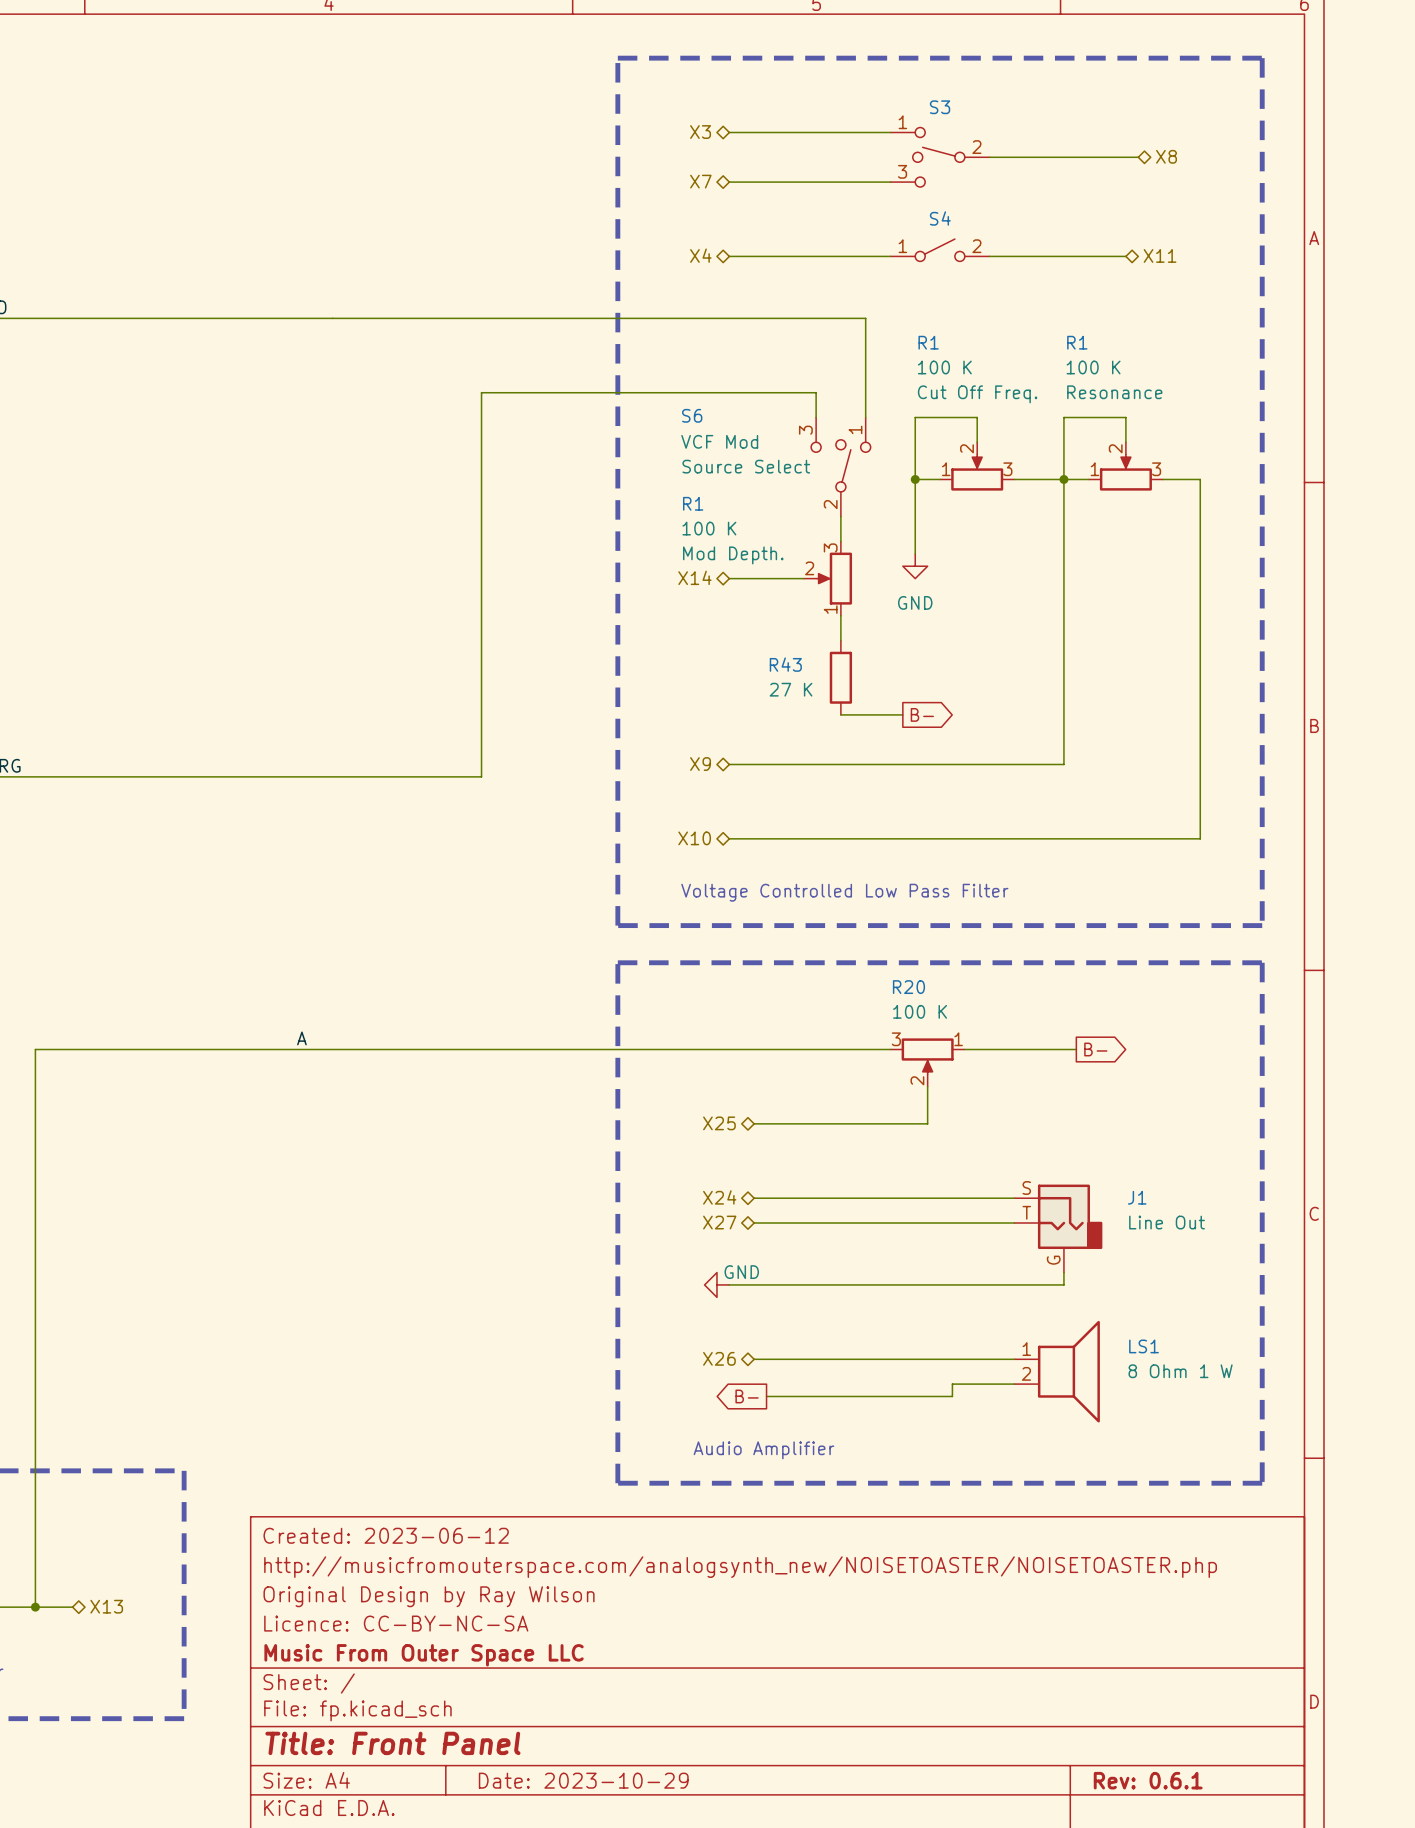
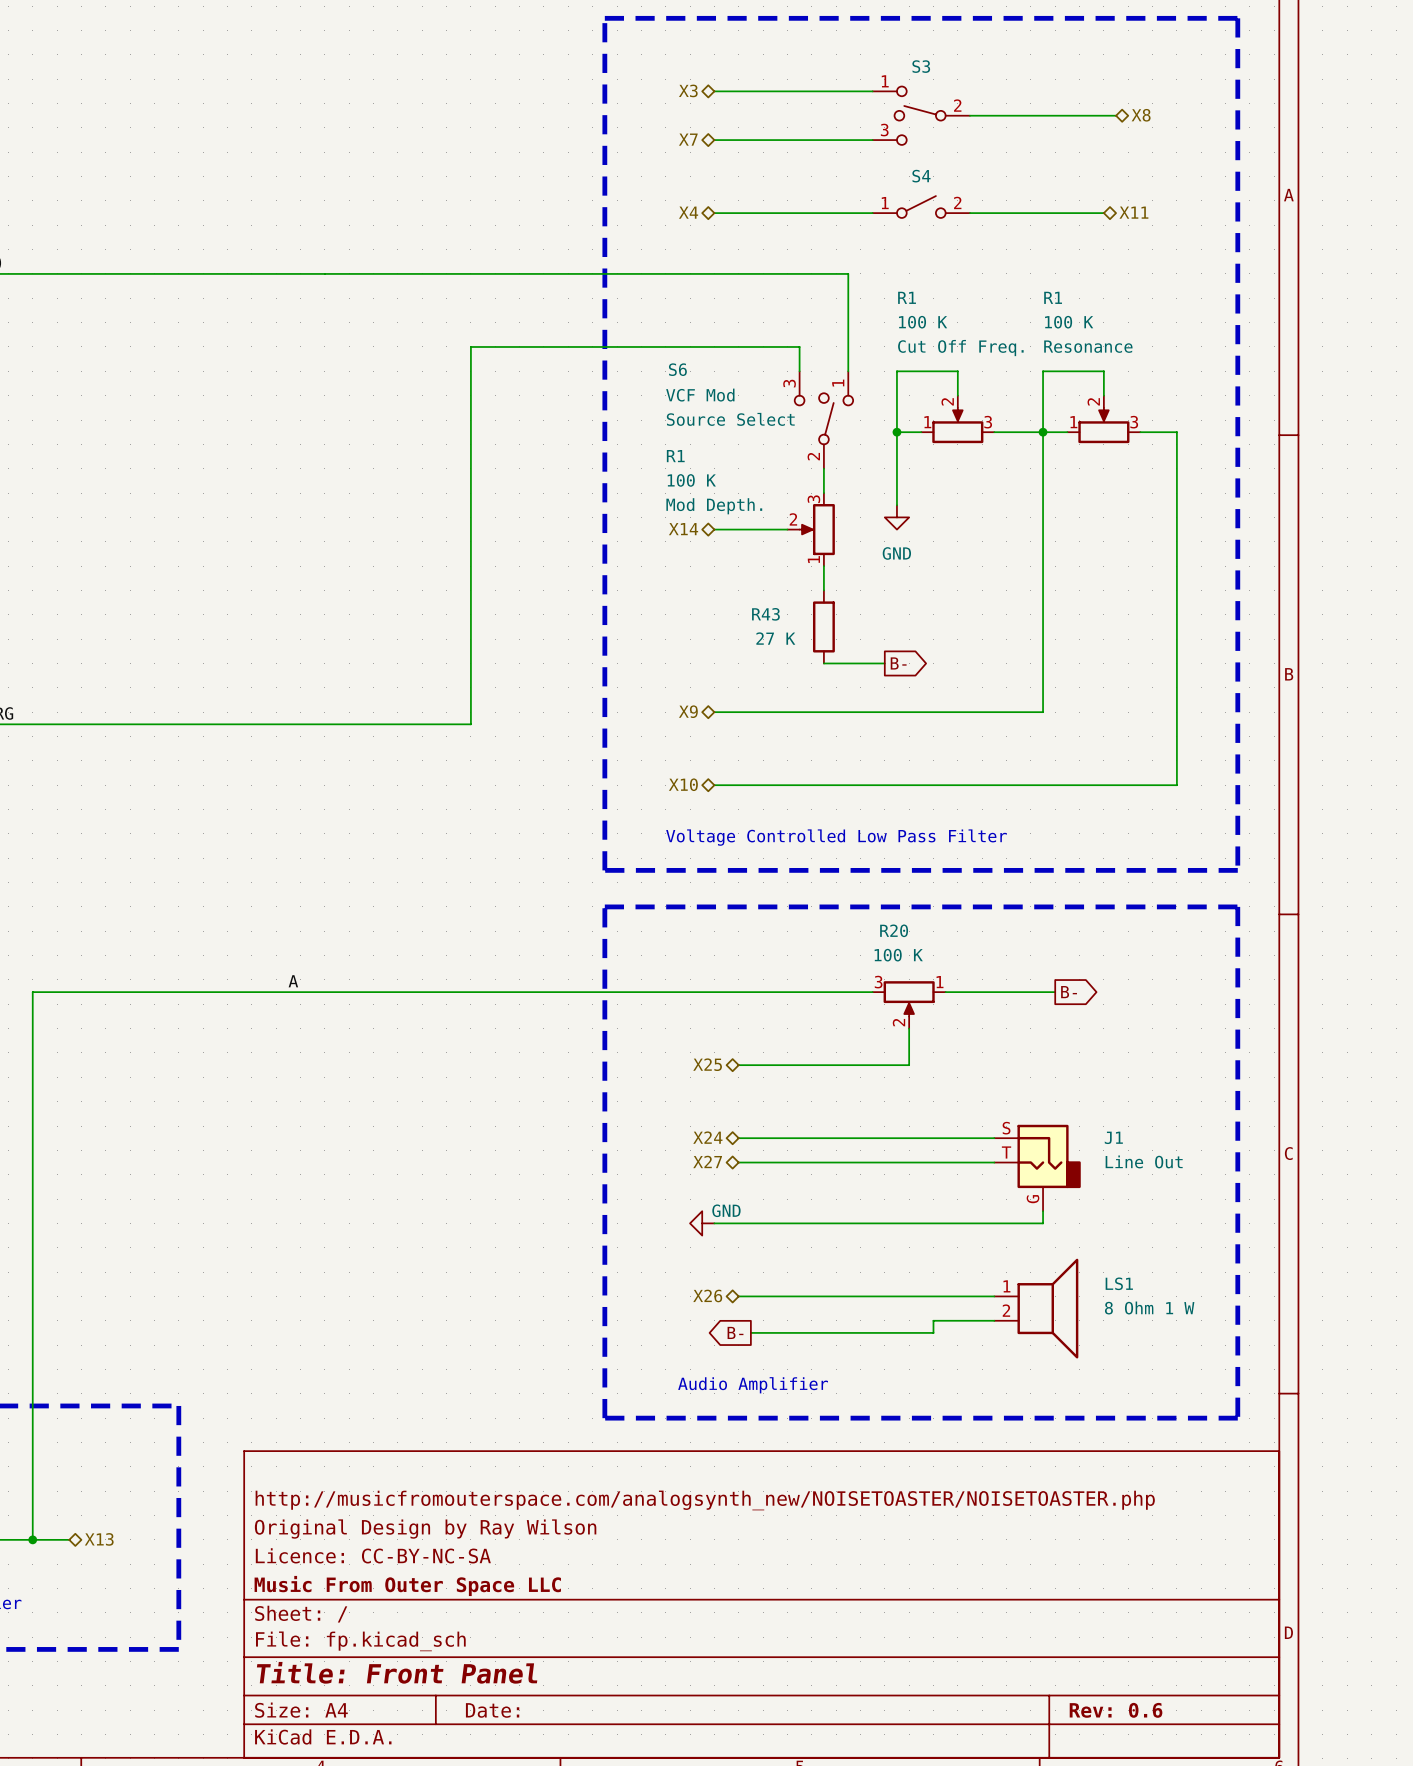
title block: Created: 2023-06-12 (386, 1535) -> none
title block: Date: 2023-10-29 (583, 1780) -> Date: (492, 1710)
title block: Rev: 0.6.1 (1148, 1780) -> Rev: 0.6 (1116, 1710)

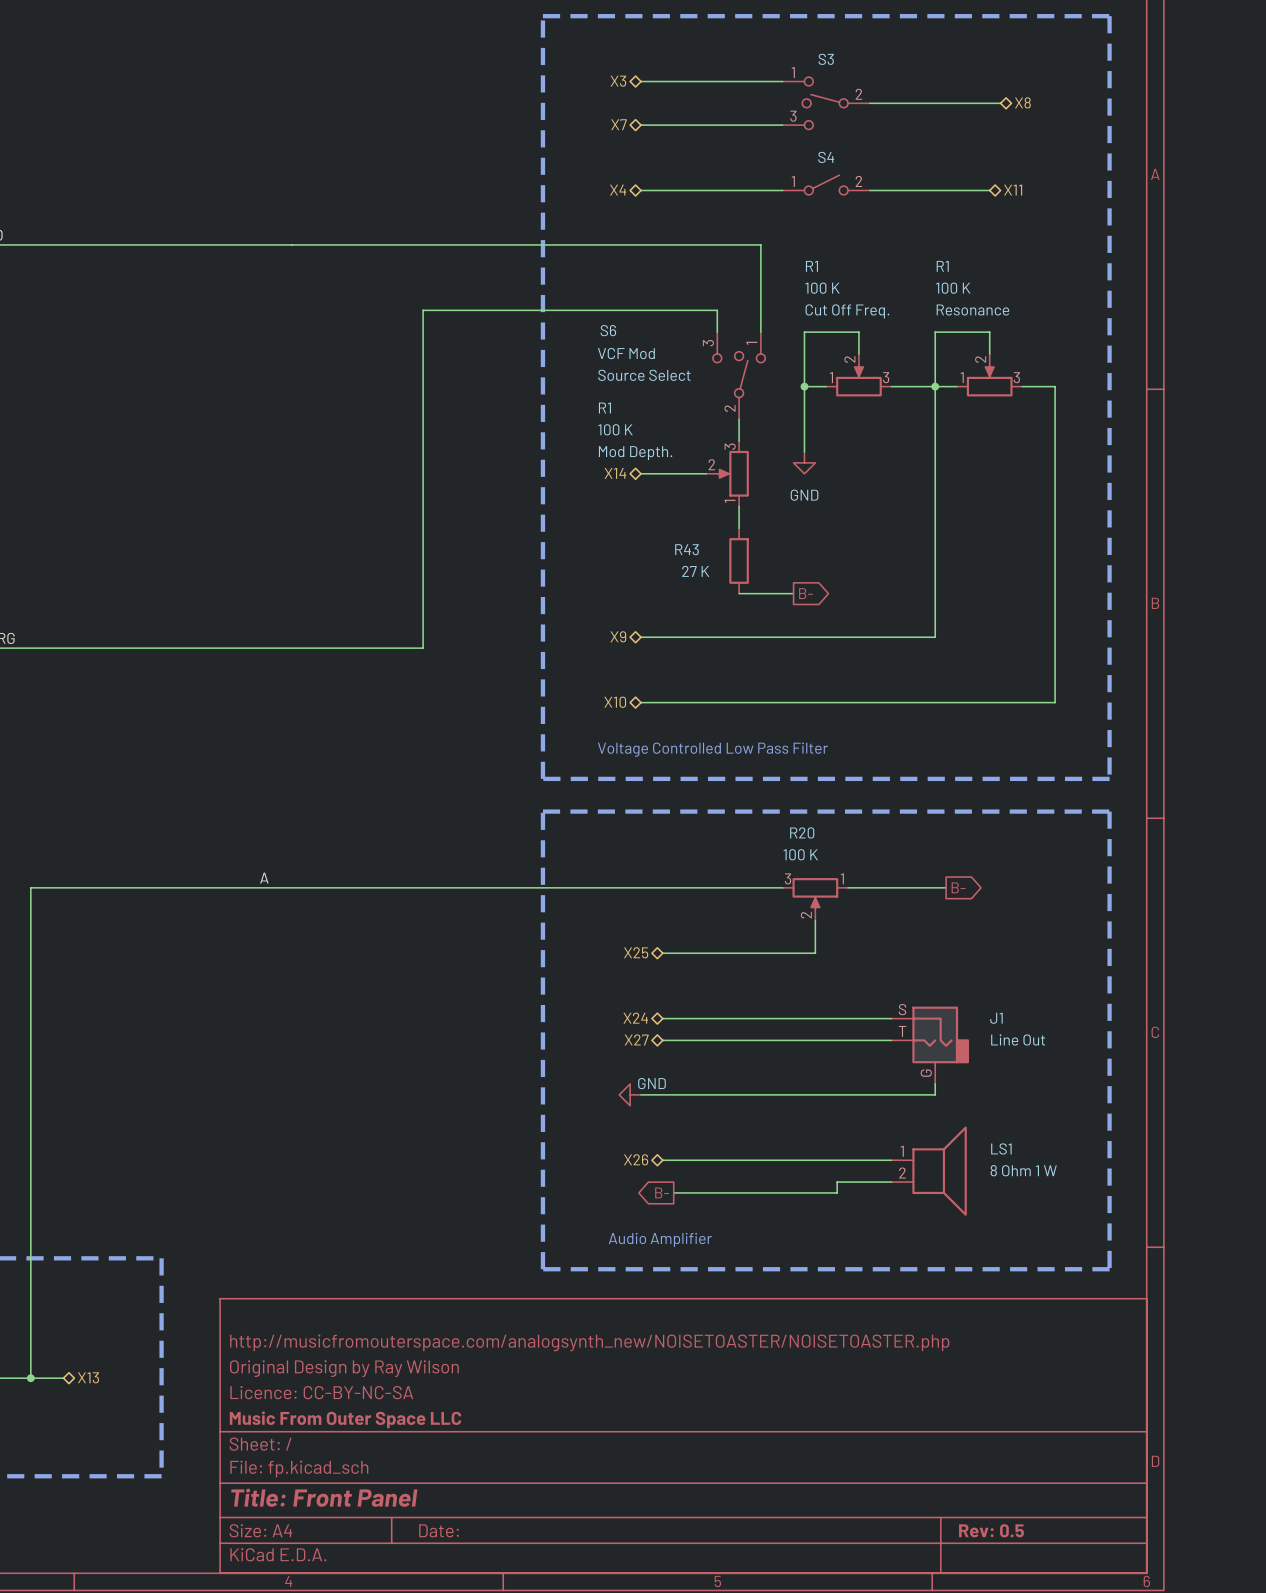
title block: Rev: 0.6 (1116, 1710) -> Rev: 0.5 (991, 1530)

